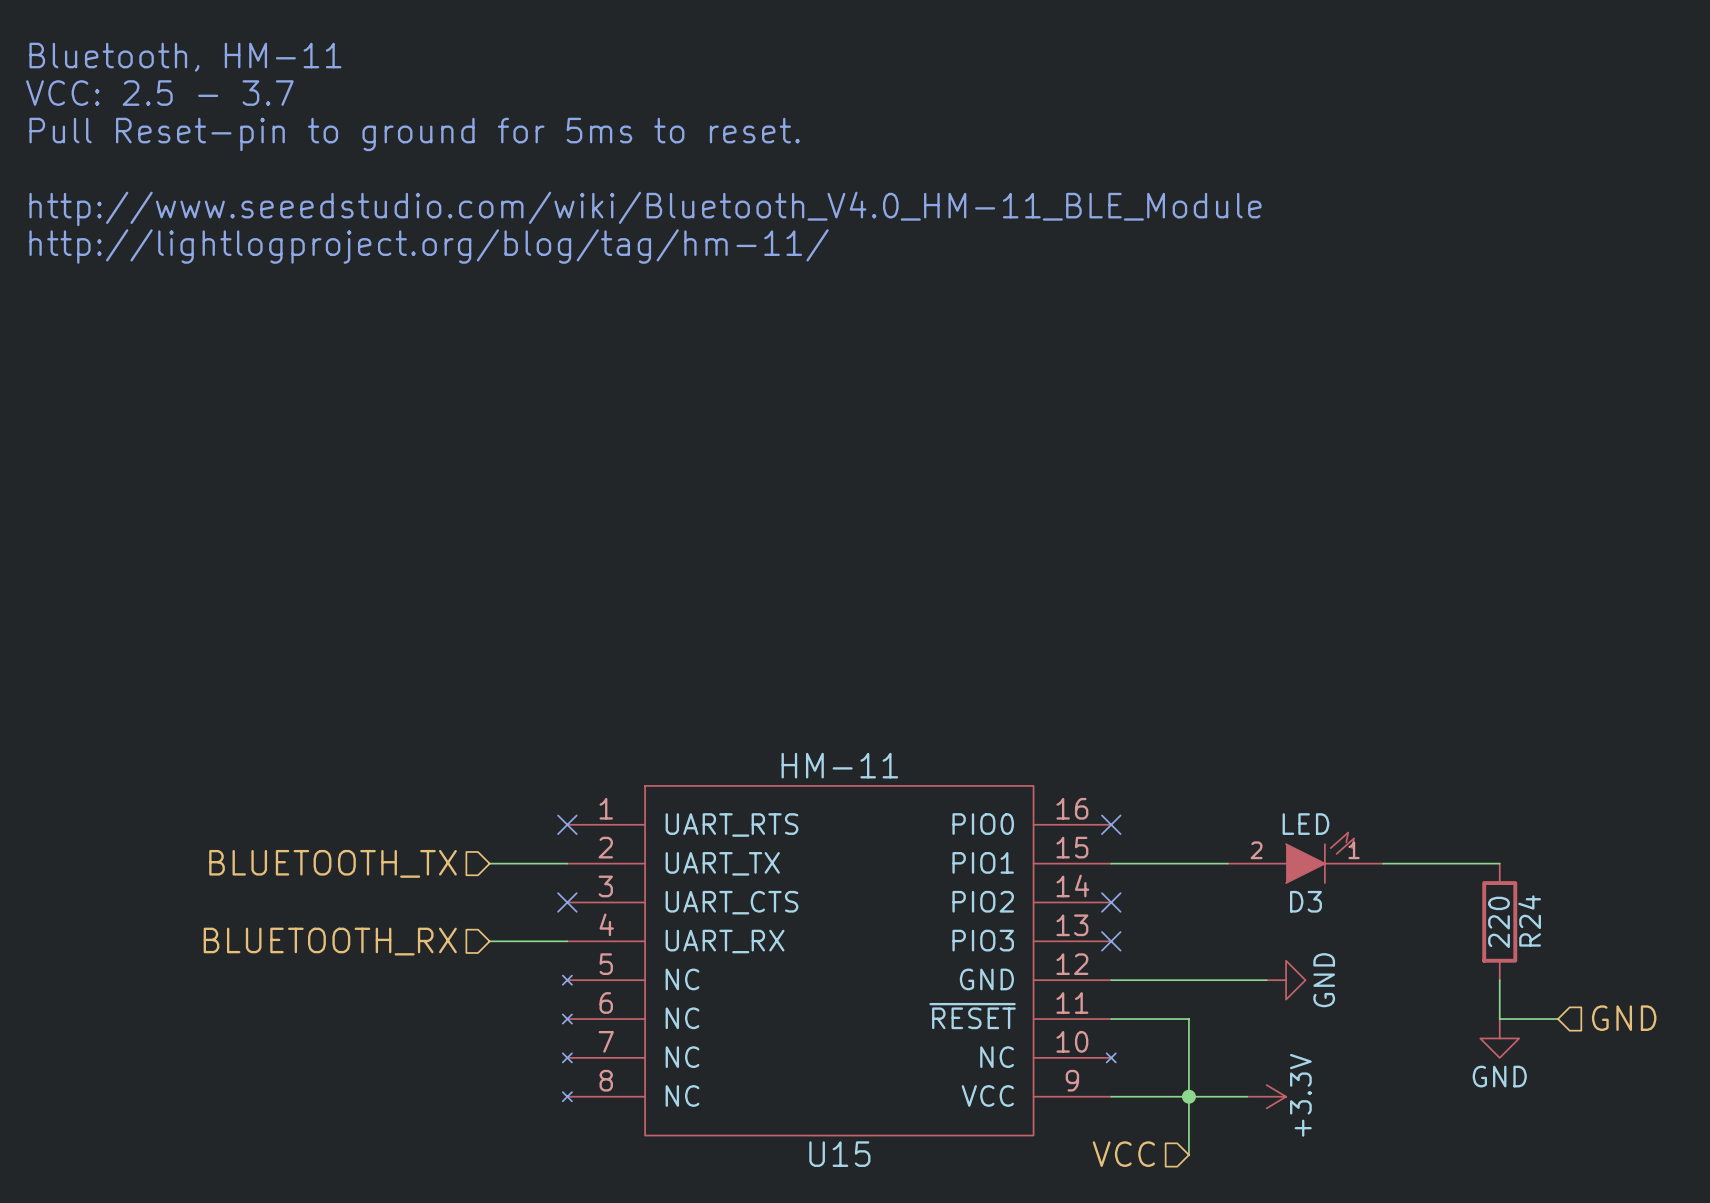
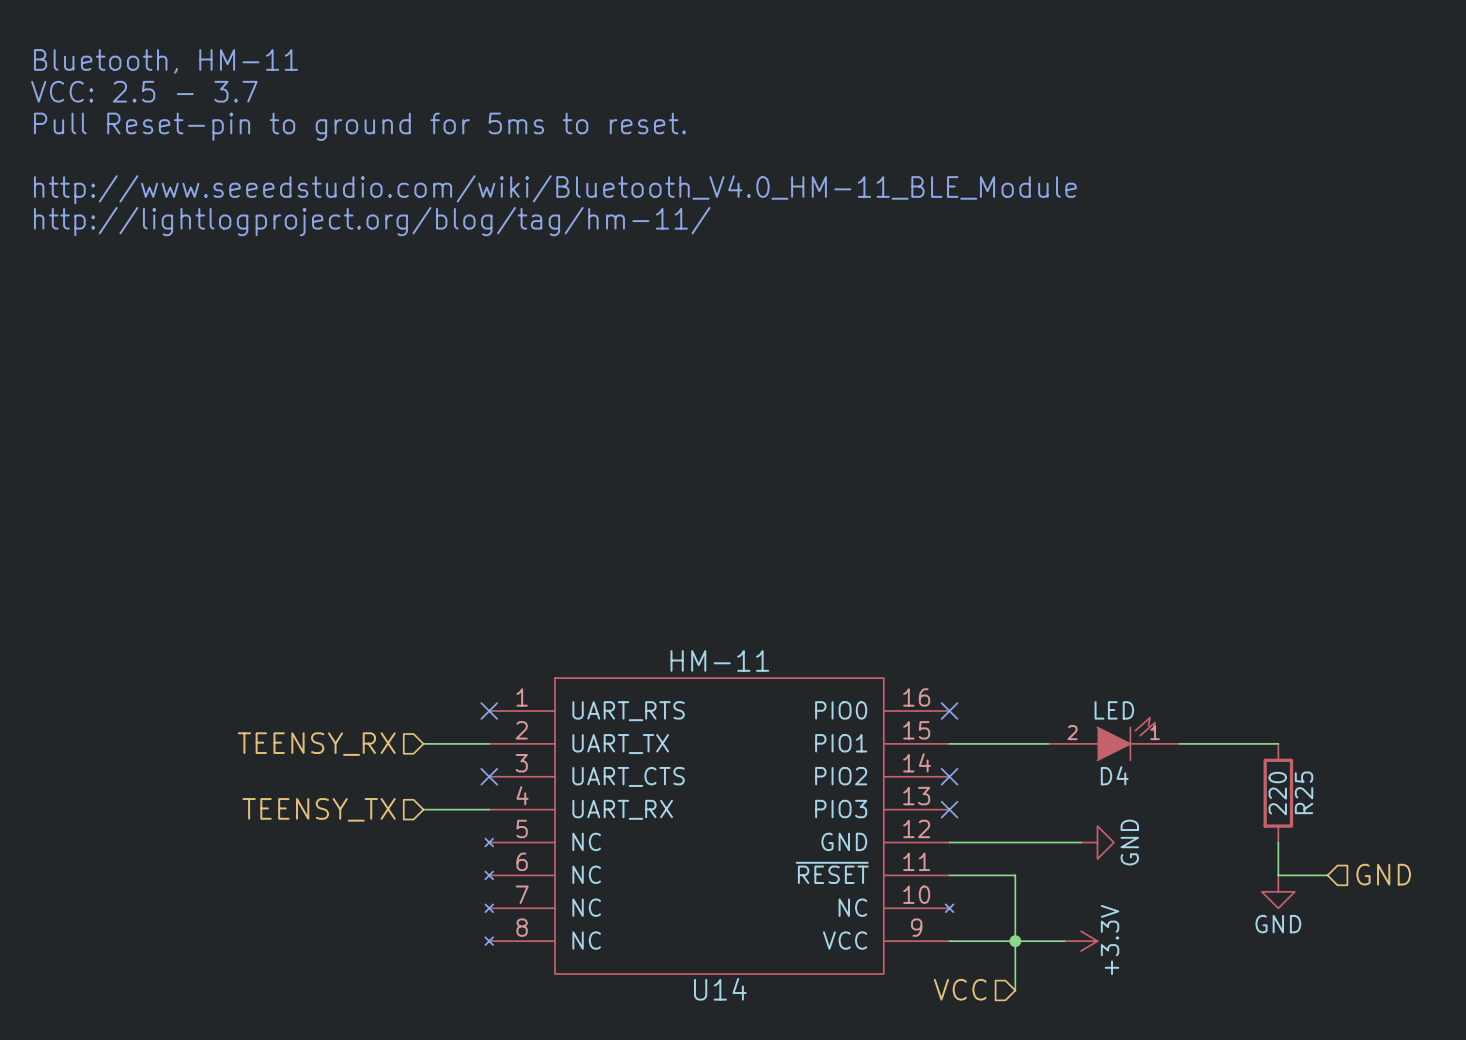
hierarchical label: BLUETOOTH_TX (333, 863) -> TEENSY_RX (316, 744)
D3 name: D3 (1305, 901) -> D4 (1114, 775)
R24 name: R24 (1529, 920) -> R25 (1304, 792)
hierarchical label: BLUETOOTH_RX (330, 941) -> TEENSY_TX (319, 809)
U15 name: U15 (839, 1154) -> U14 (720, 989)

